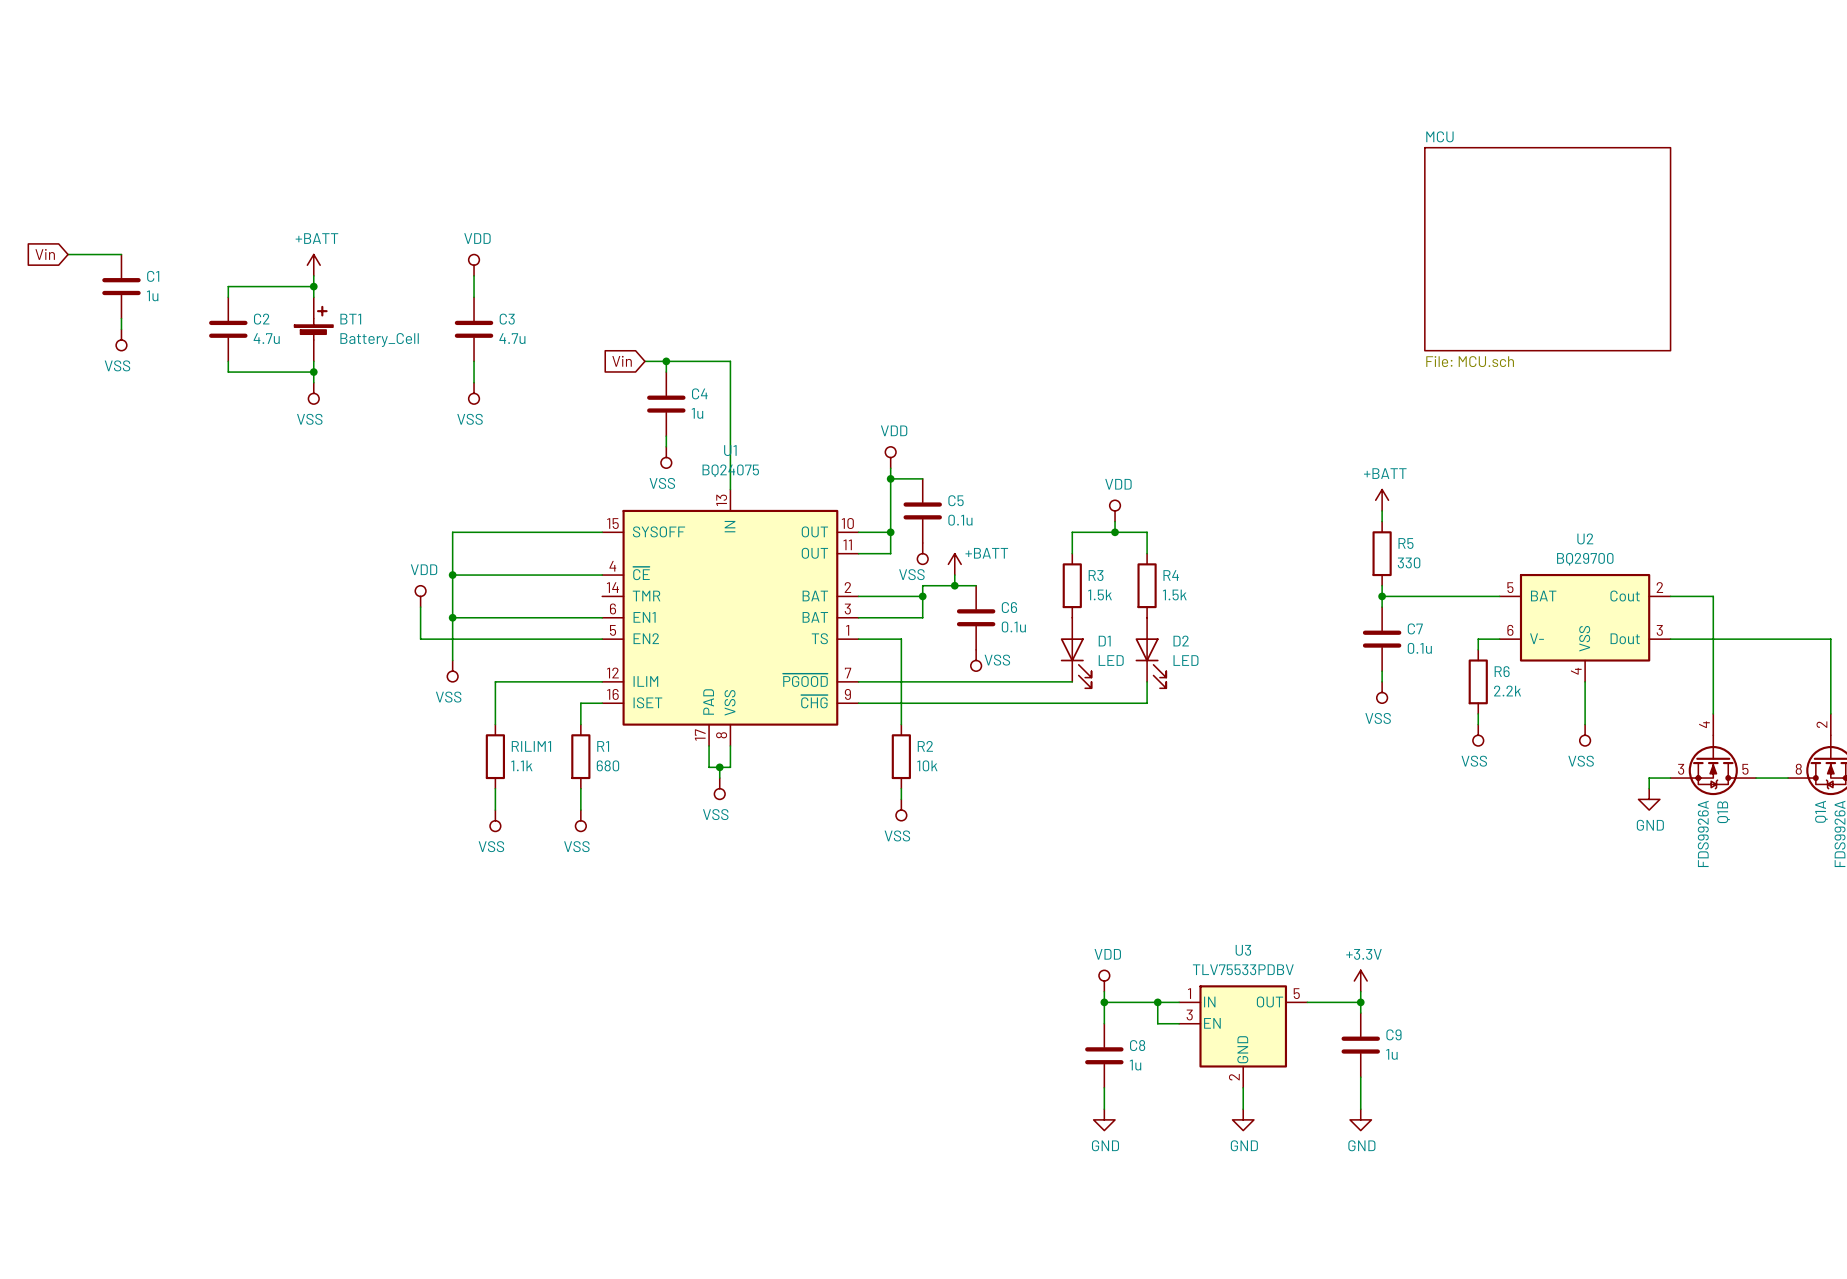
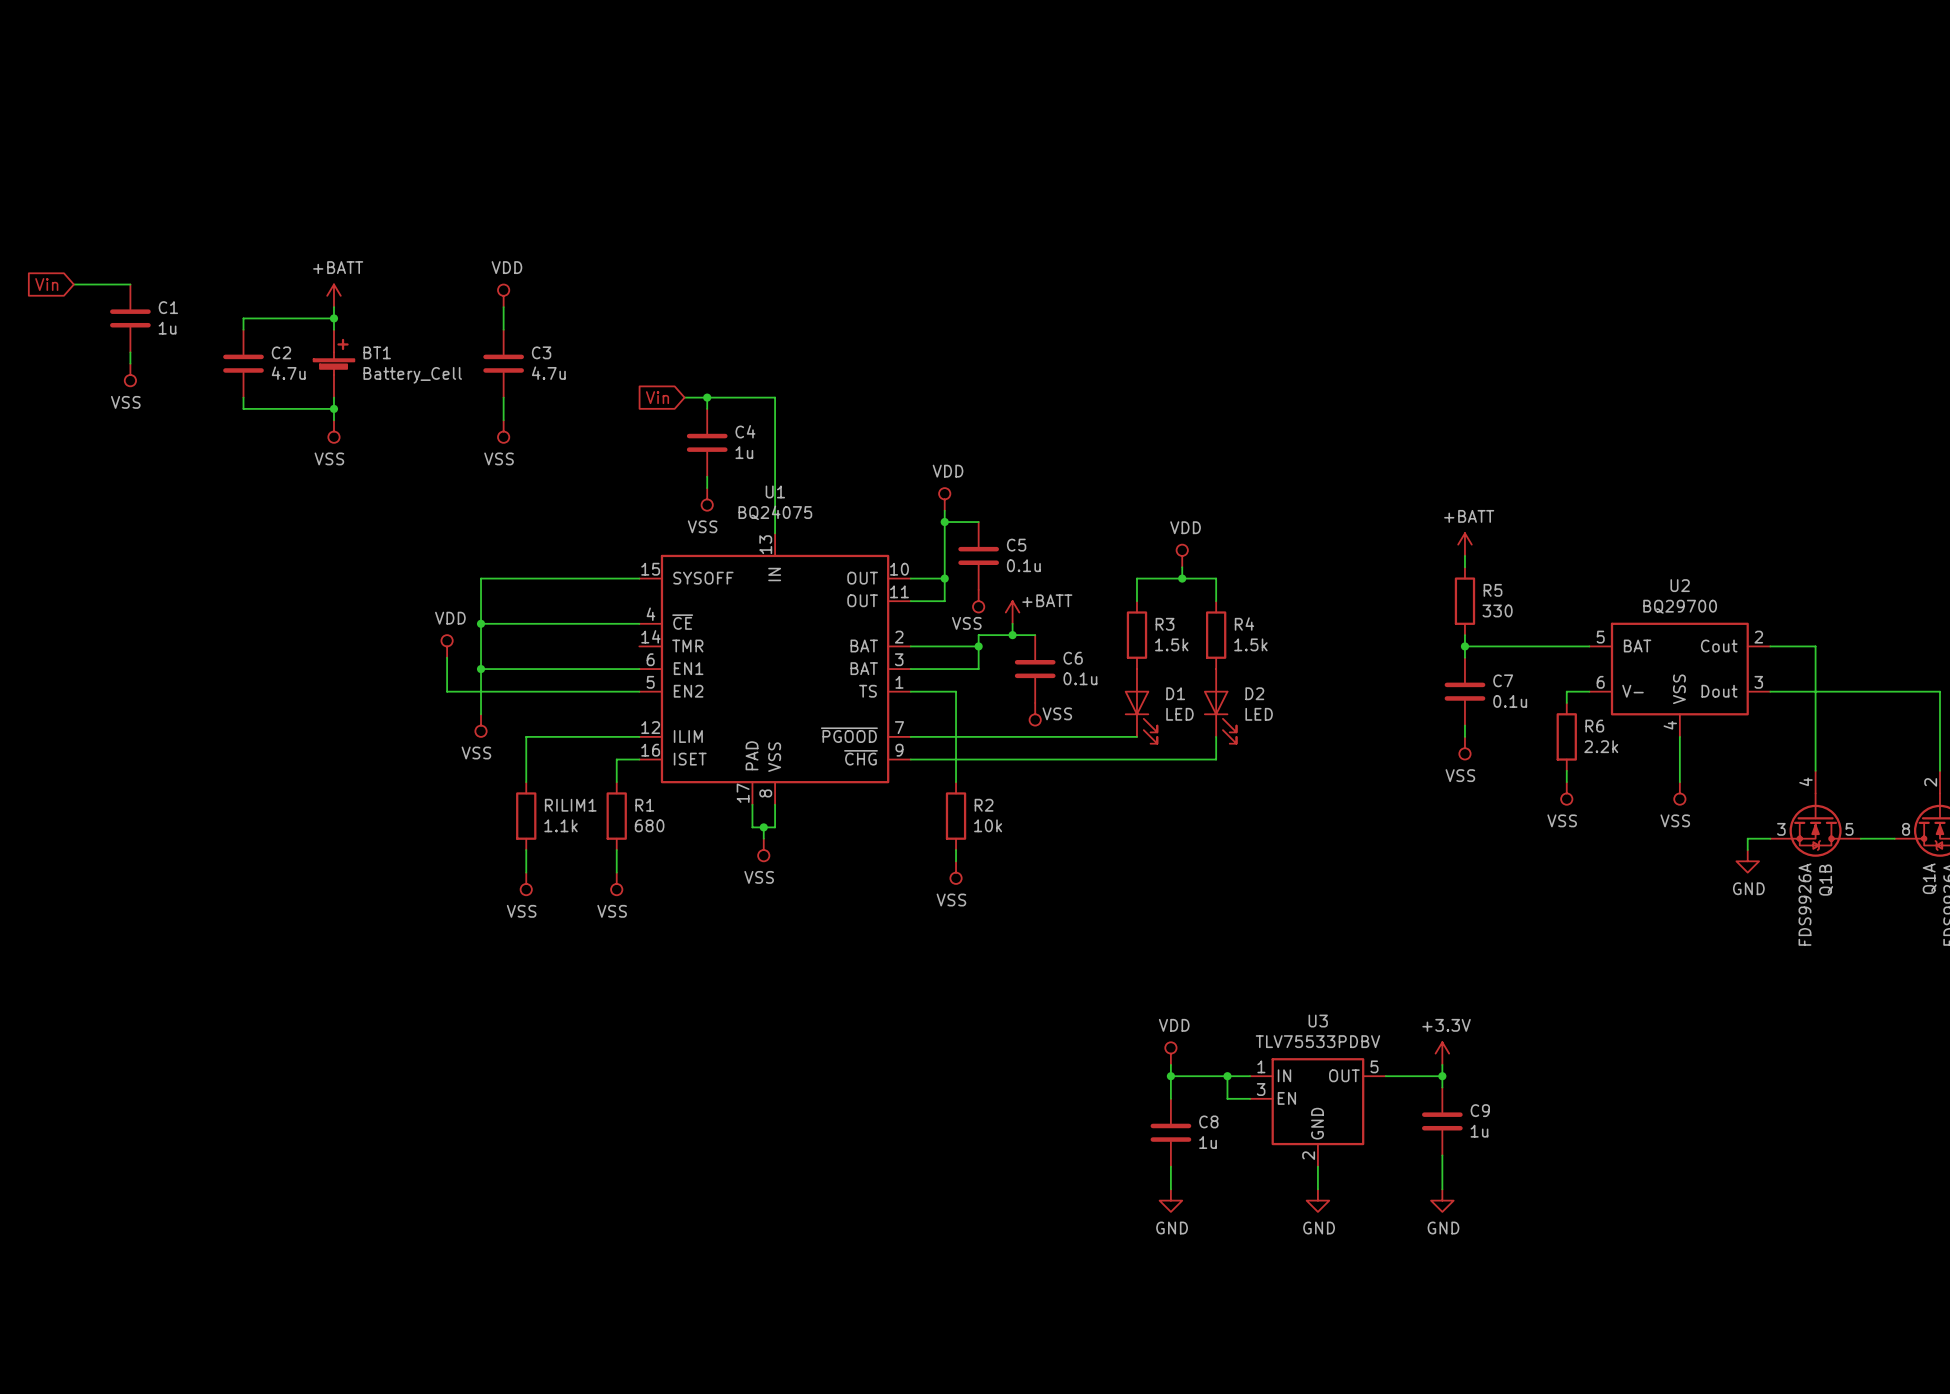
sheet MCU: File: MCU.sch (1547, 249) -> none

